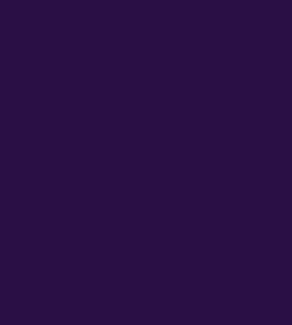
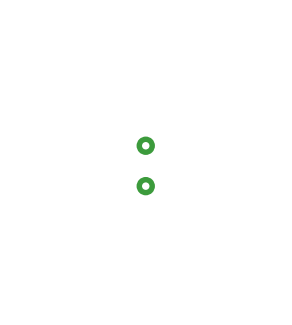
part: none -> (145, 165)

